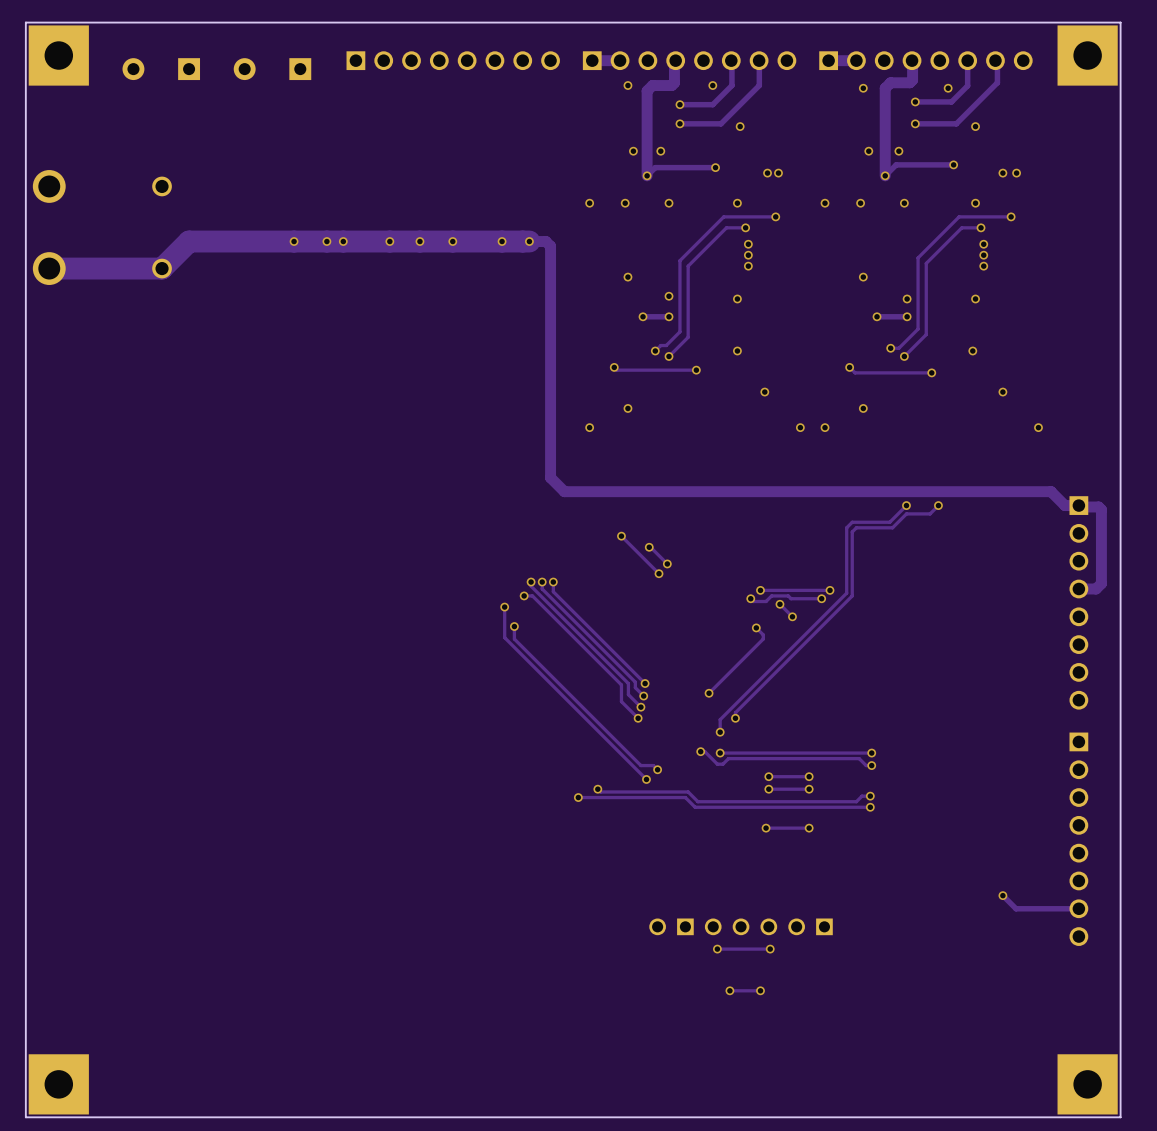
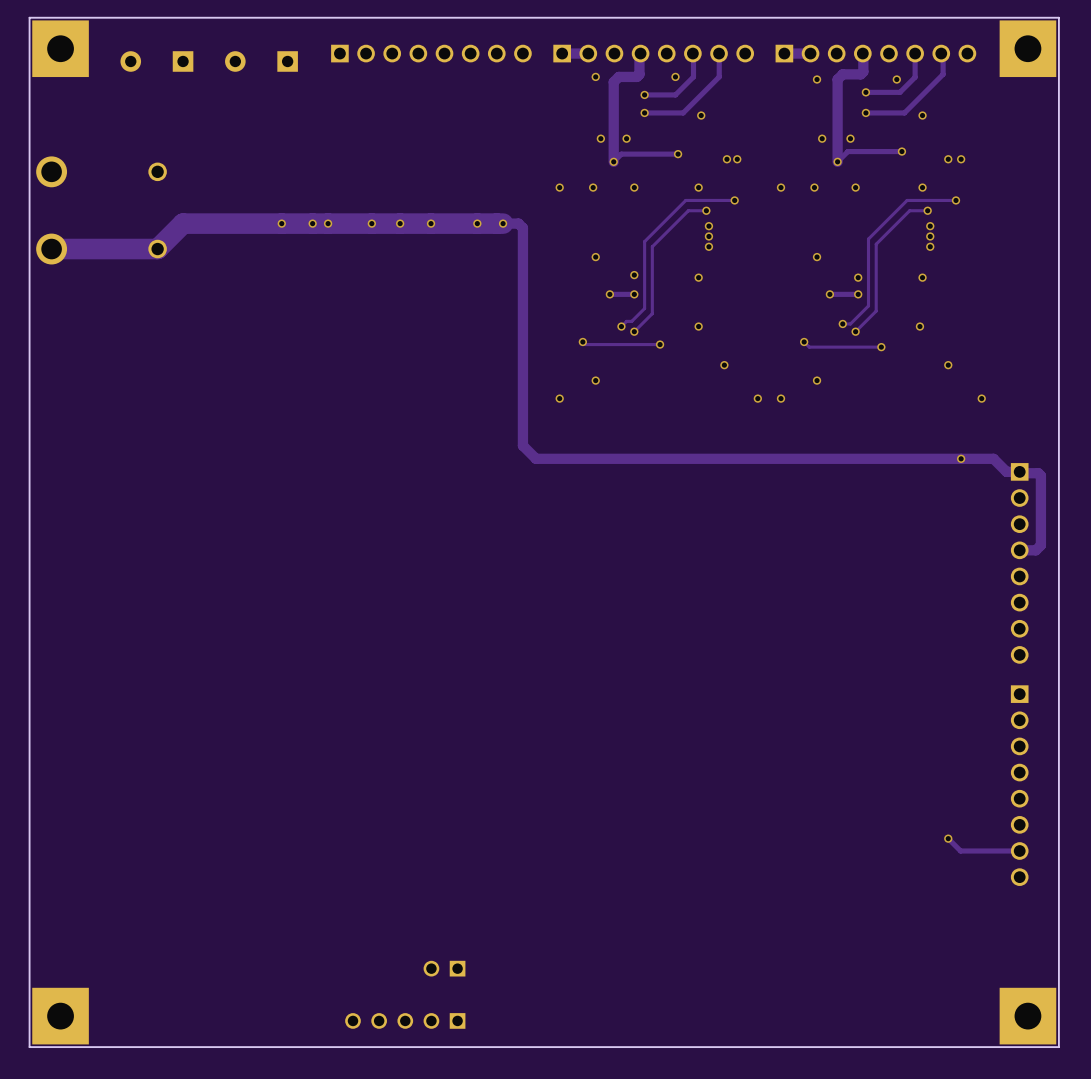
via: none -> (961, 458)
track: (906, 505) (889, 522) (852, 522) (846, 527) (846, 593) (720, 719) (720, 732) -> none
via: (906, 505) -> none
track: (938, 505) (930, 513) (906, 513) (892, 527) (856, 527) (852, 531) (852, 595) (735, 712) (735, 718) -> none
via: (938, 505) -> none
track: (621, 536) (659, 573) -> none
via: (621, 536) -> none
track: (649, 547) (667, 563) -> none
via: (649, 547) -> none
via: (667, 563) -> none
via: (659, 573) -> none
track: (531, 582) (531, 586) (628, 683) (628, 694) (640, 707) -> none
via: (531, 582) -> none
track: (542, 582) (542, 588) (635, 682) (635, 687) (643, 696) -> none
via: (542, 582) -> none
track: (553, 582) (553, 591) (645, 683) -> none
via: (553, 582) -> none
via: (760, 590) -> none
track: (830, 590) (760, 590) -> none
via: (830, 590) -> none
track: (524, 595) (532, 595) (621, 684) (621, 701) (638, 718) -> none
via: (524, 595) -> none
via: (750, 598) -> none
track: (821, 598) (791, 598) (788, 595) (771, 595) (766, 601) (753, 601) (750, 598) -> none
via: (821, 598) -> none
track: (779, 604) (792, 616) -> none
via: (779, 604) -> none
track: (504, 607) (504, 637) (646, 779) -> none
via: (504, 607) -> none
via: (792, 616) -> none
track: (514, 626) (514, 639) (640, 765) (653, 765) (657, 769) -> none
via: (514, 626) -> none
track: (756, 627) (763, 634) (763, 639) (709, 693) -> none
via: (756, 627) -> none
via: (645, 683) -> none
via: (709, 693) -> none
via: (643, 696) -> none
via: (640, 707) -> none
via: (638, 718) -> none
via: (735, 718) -> none
via: (720, 732) -> none
track: (700, 751) (704, 751) (717, 764) (722, 764) (728, 758) (859, 758) (866, 765) (871, 765) -> none
via: (700, 751) -> none
via: (720, 753) -> none
track: (871, 753) (720, 753) -> none
via: (871, 753) -> none
via: (871, 765) -> none
via: (657, 769) -> none
via: (768, 776) -> none
track: (809, 776) (768, 776) -> none
via: (809, 776) -> none
via: (646, 779) -> none
track: (597, 789) (600, 791) (688, 791) (697, 801) (856, 801) (861, 796) (870, 796) -> none
via: (597, 789) -> none
via: (768, 789) -> none
track: (809, 789) (768, 789) -> none
via: (809, 789) -> none
via: (870, 796) -> none
track: (578, 797) (685, 797) (695, 807) (870, 807) -> none
via: (578, 797) -> none
via: (870, 807) -> none
via: (766, 828) -> none
track: (809, 828) (766, 828) -> none
via: (809, 828) -> none
part position: (671, 926) -> (444, 968)
part: (768, 926) -> none
via: (717, 949) -> none
track: (770, 949) (717, 949) -> none
via: (770, 949) -> none
via: (729, 990) -> none
track: (760, 990) (729, 990) -> none
via: (760, 990) -> none
part: none -> (405, 1020)

